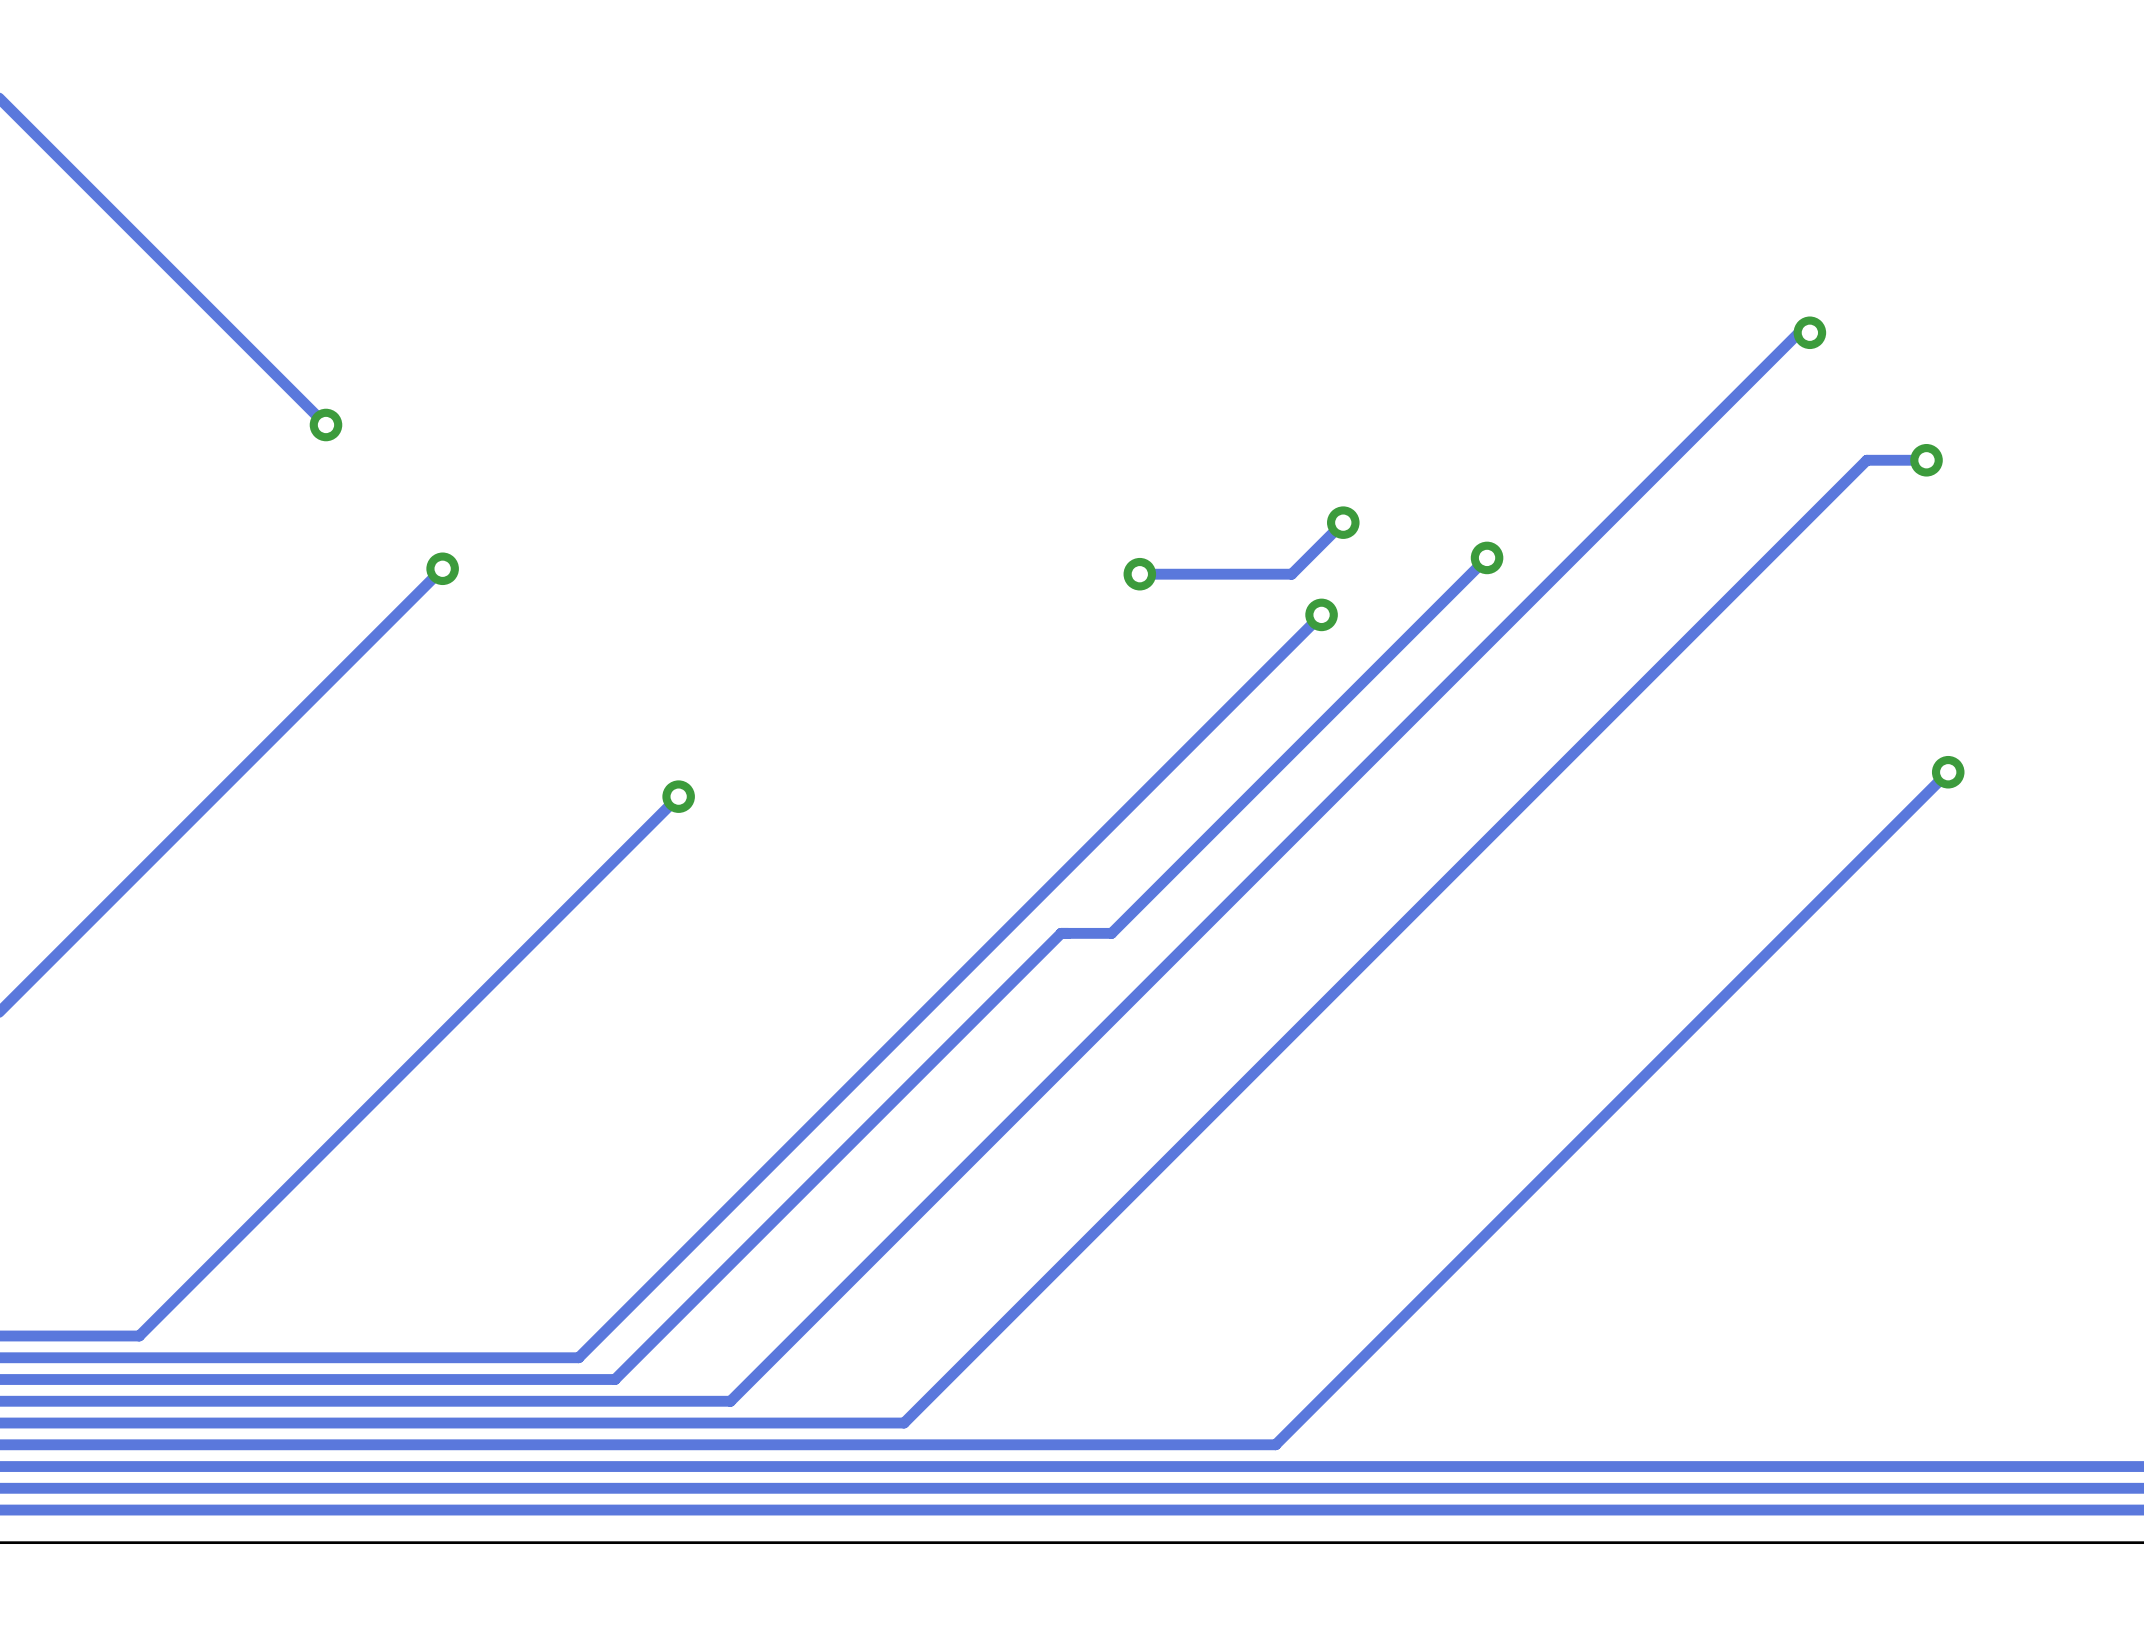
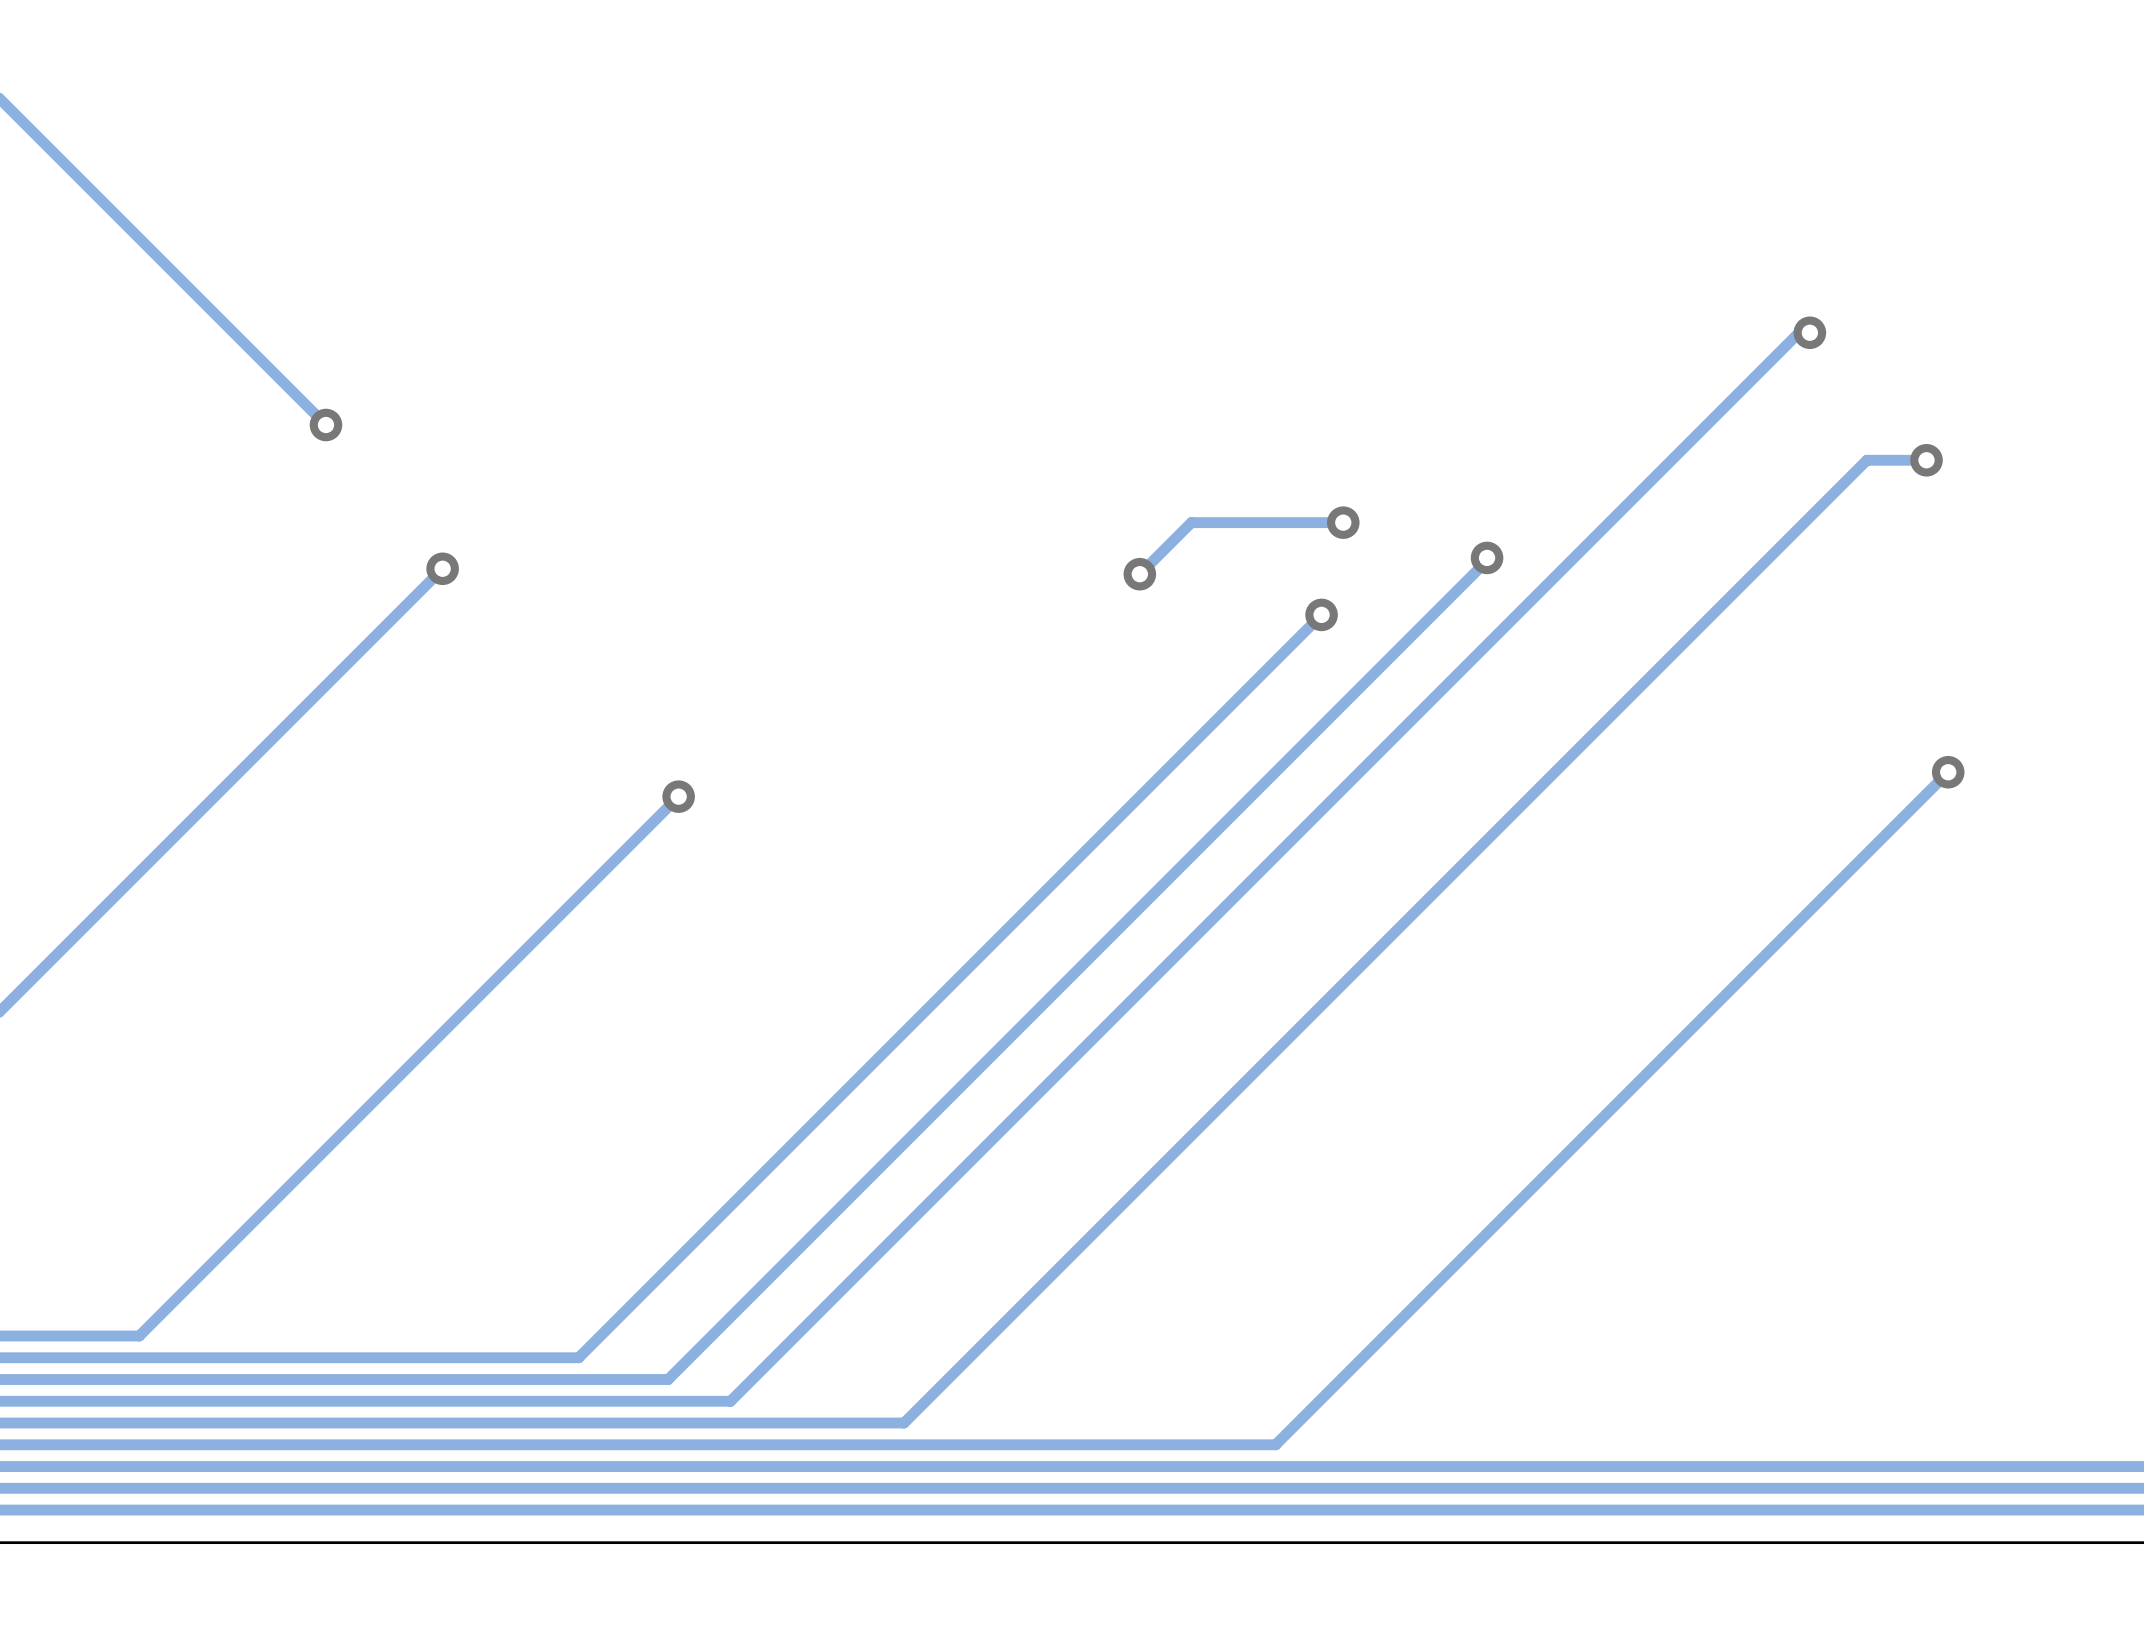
track: (1343, 522) (1291, 574) (1139, 574) -> (1343, 522) (1191, 522) (1139, 574)
track: (1487, 557) (1111, 933) (1061, 933) (615, 1379) -> (1487, 557) (1487, 560) (668, 1379) (615, 1379)

